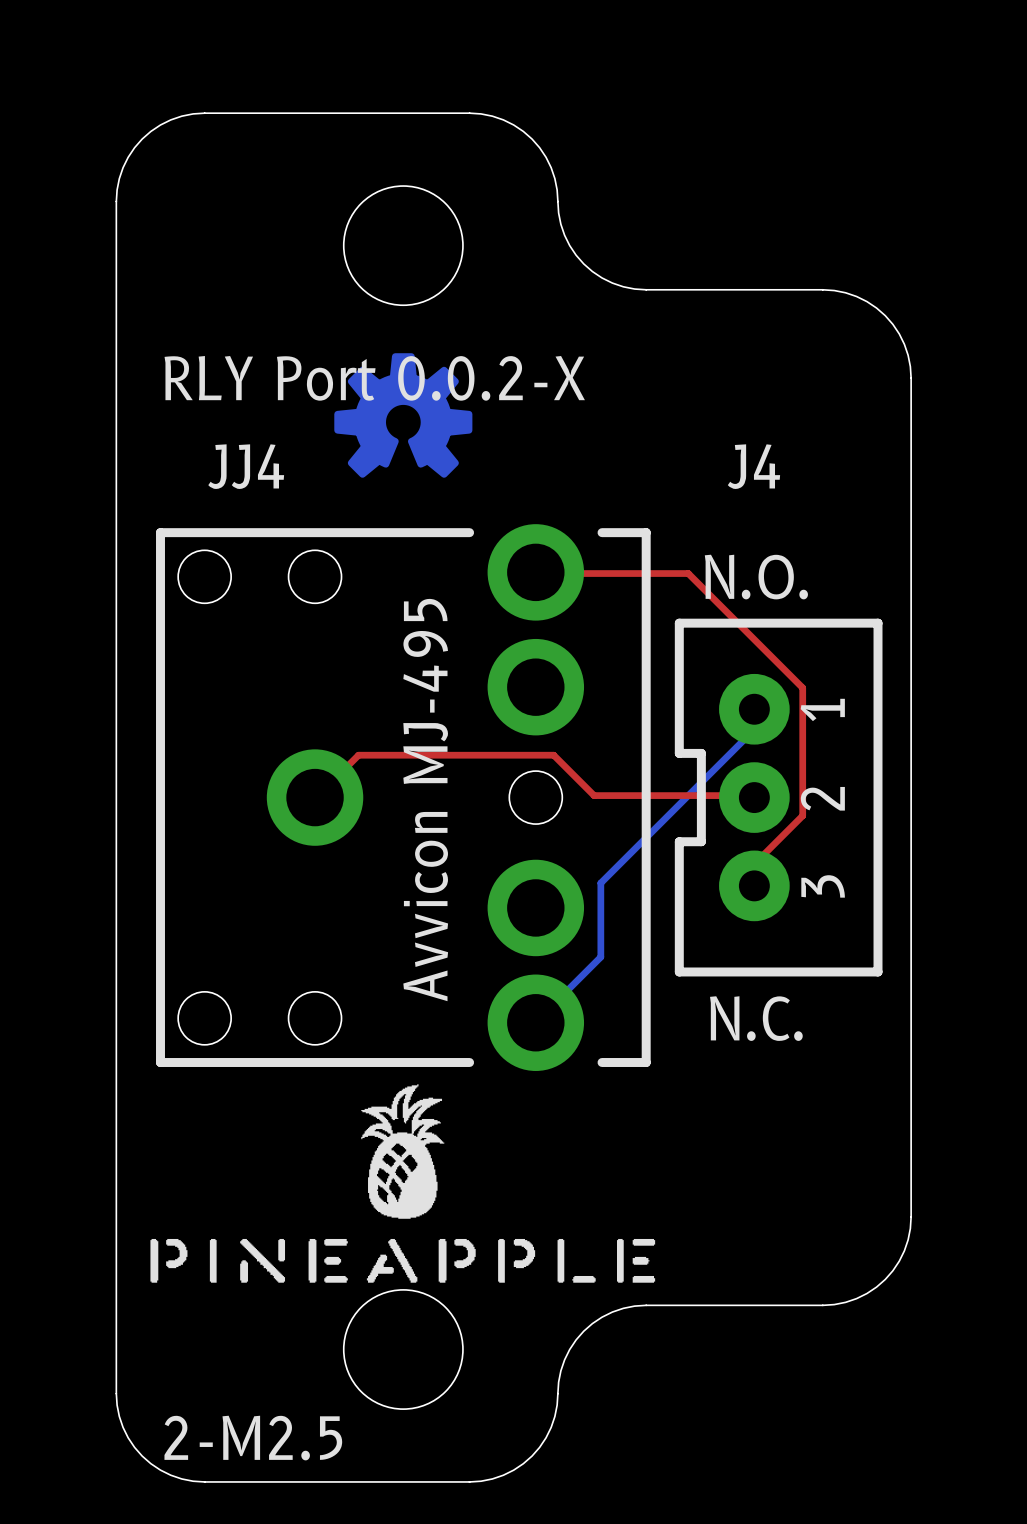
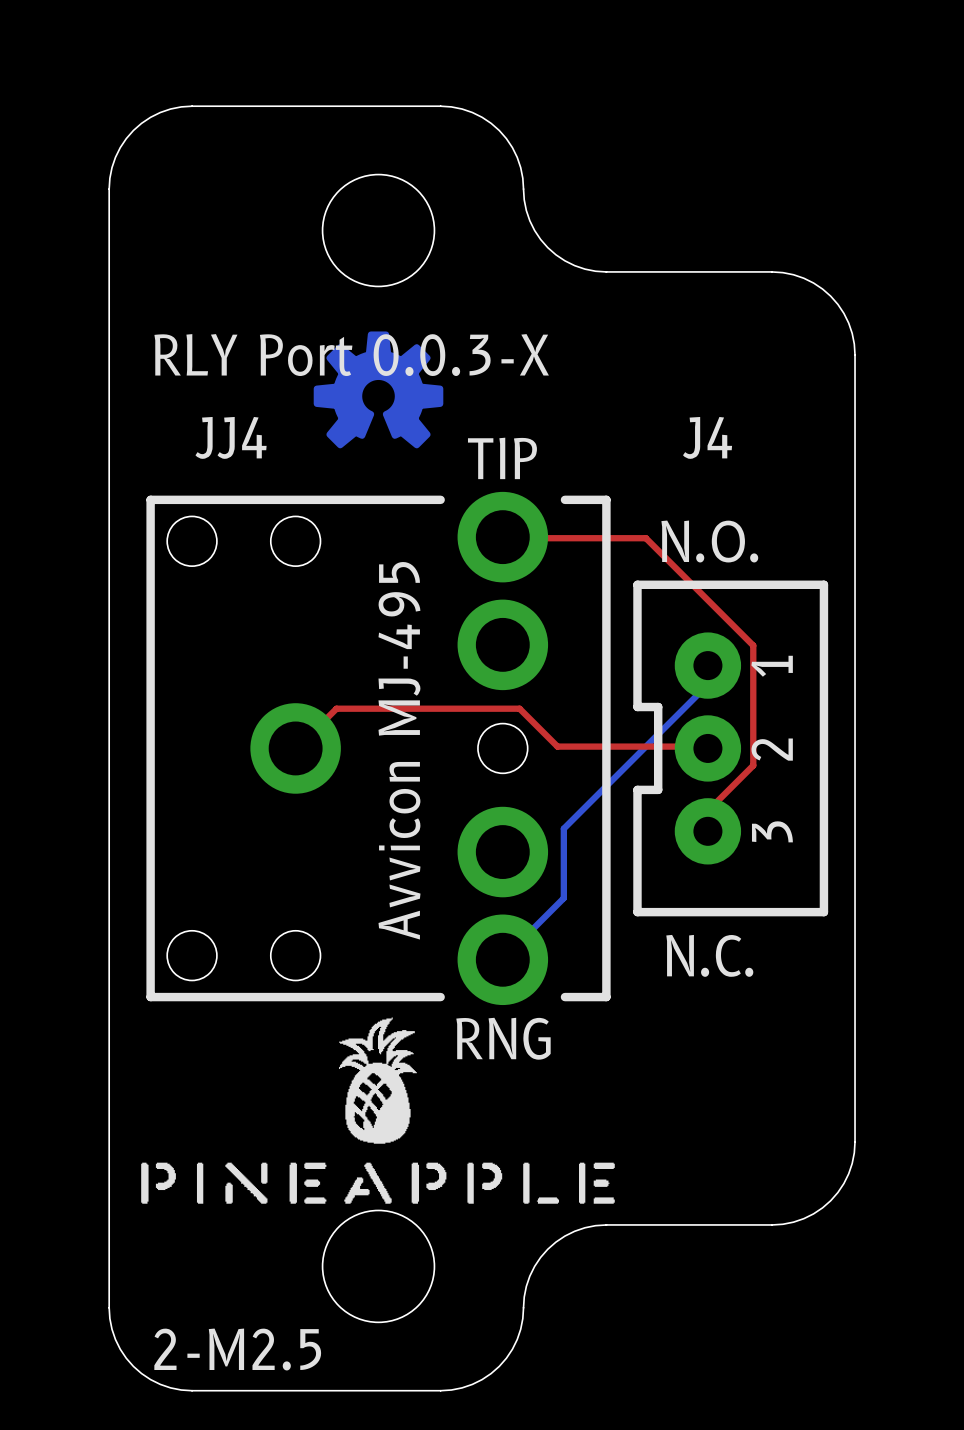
text: RLY Port 0.0.2-X (374, 378) -> RLY Port 0.0.3-X (351, 355)
text: none -> TIP (502, 458)
text: none -> RNG (503, 1038)

